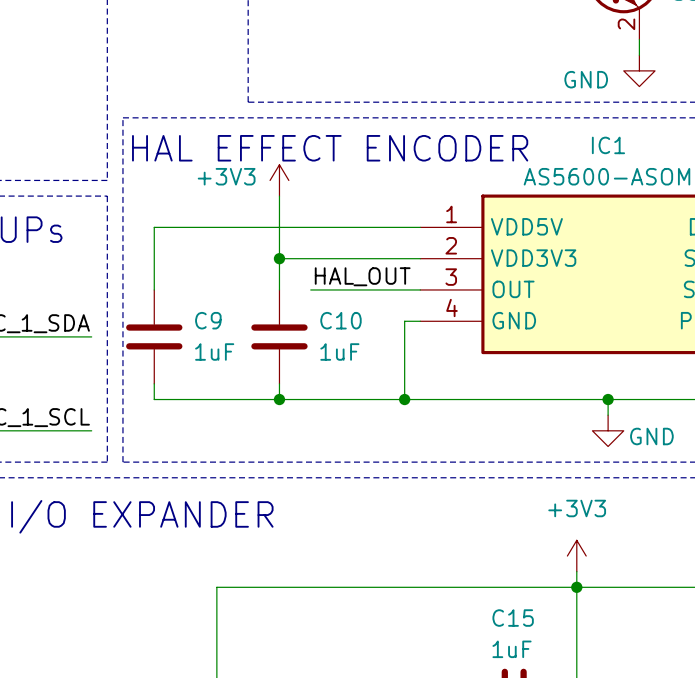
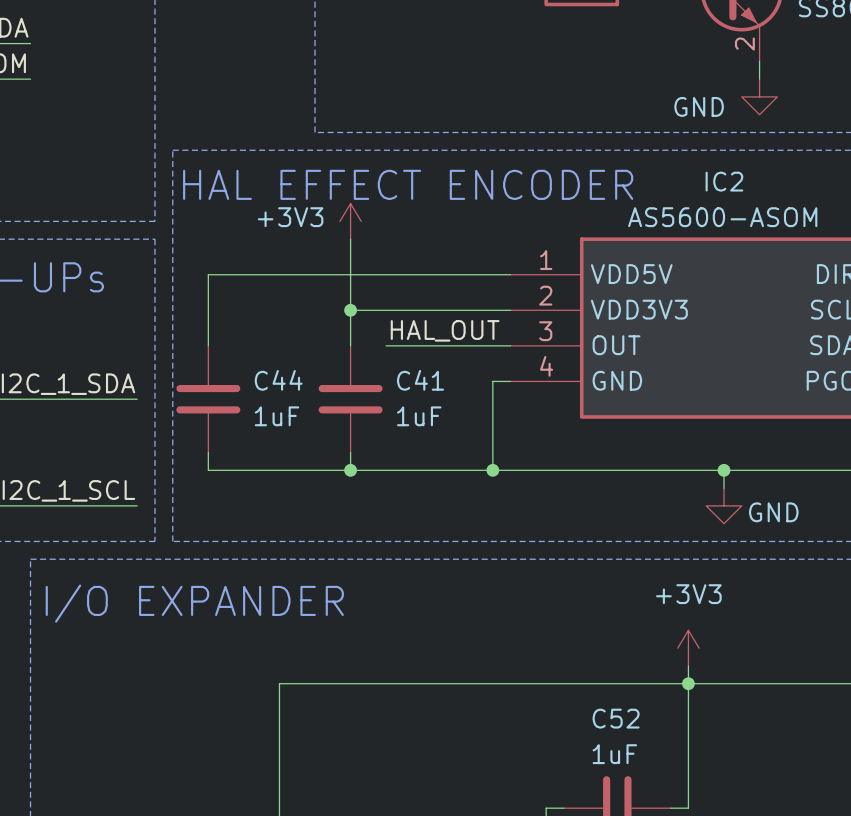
IC1 name: IC1 (608, 145) -> IC2 (724, 181)
C9 name: C9 (208, 320) -> C44 (278, 380)
C10 name: C10 (340, 320) -> C41 (420, 380)
C15 name: C15 (513, 618) -> C52 (616, 718)

